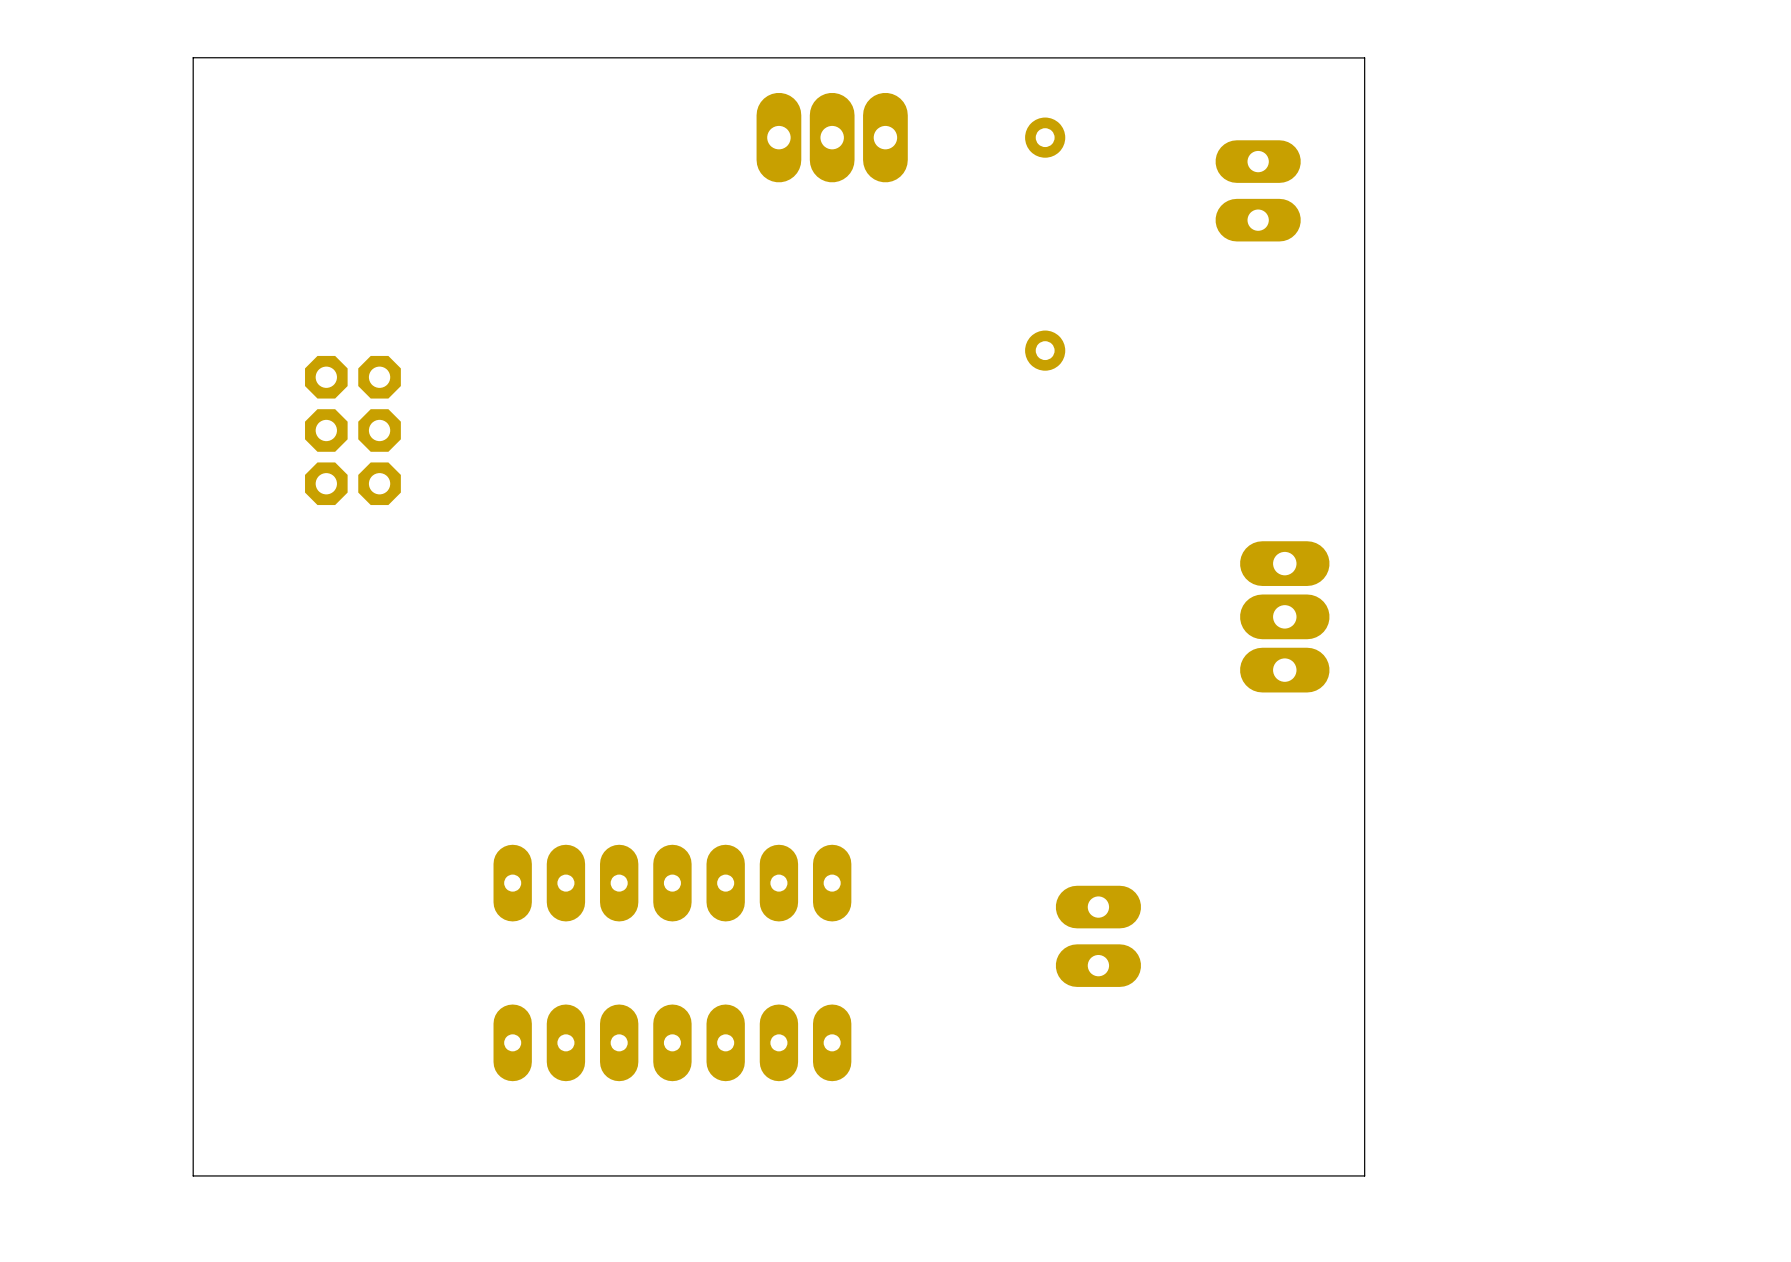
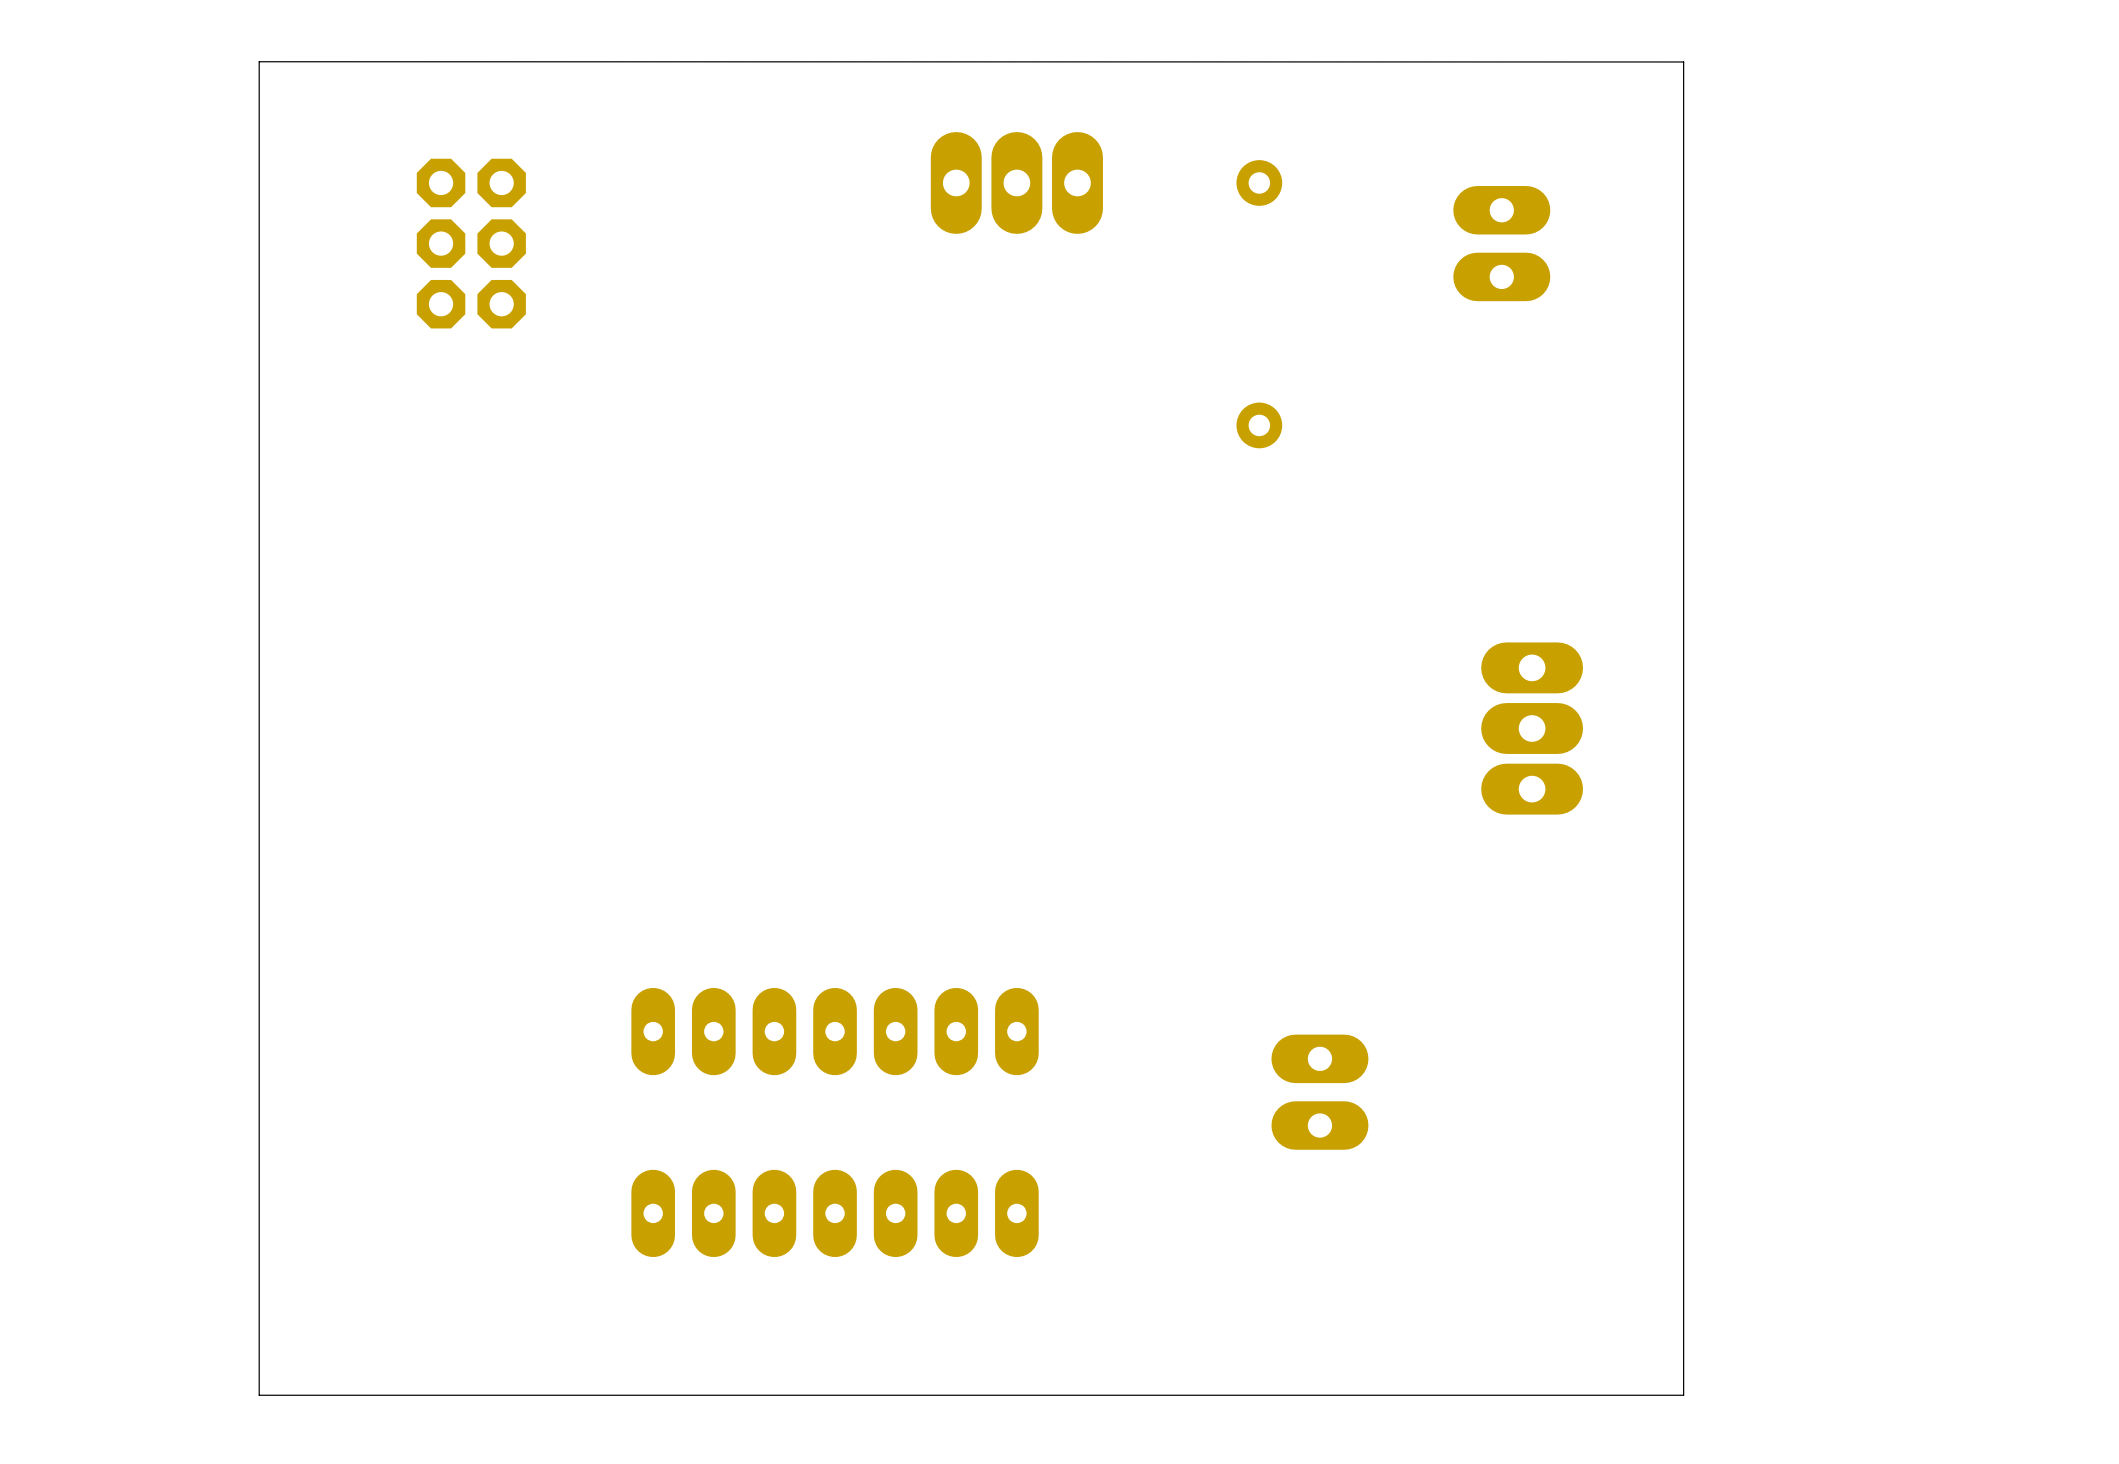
board edge: (193, 57) (193, 1175) (1364, 1175) (1364, 57) (193, 57) -> (259, 61) (1683, 61) (1683, 1395) (259, 1395) (259, 61)
part position: (352, 430) -> (471, 243)

